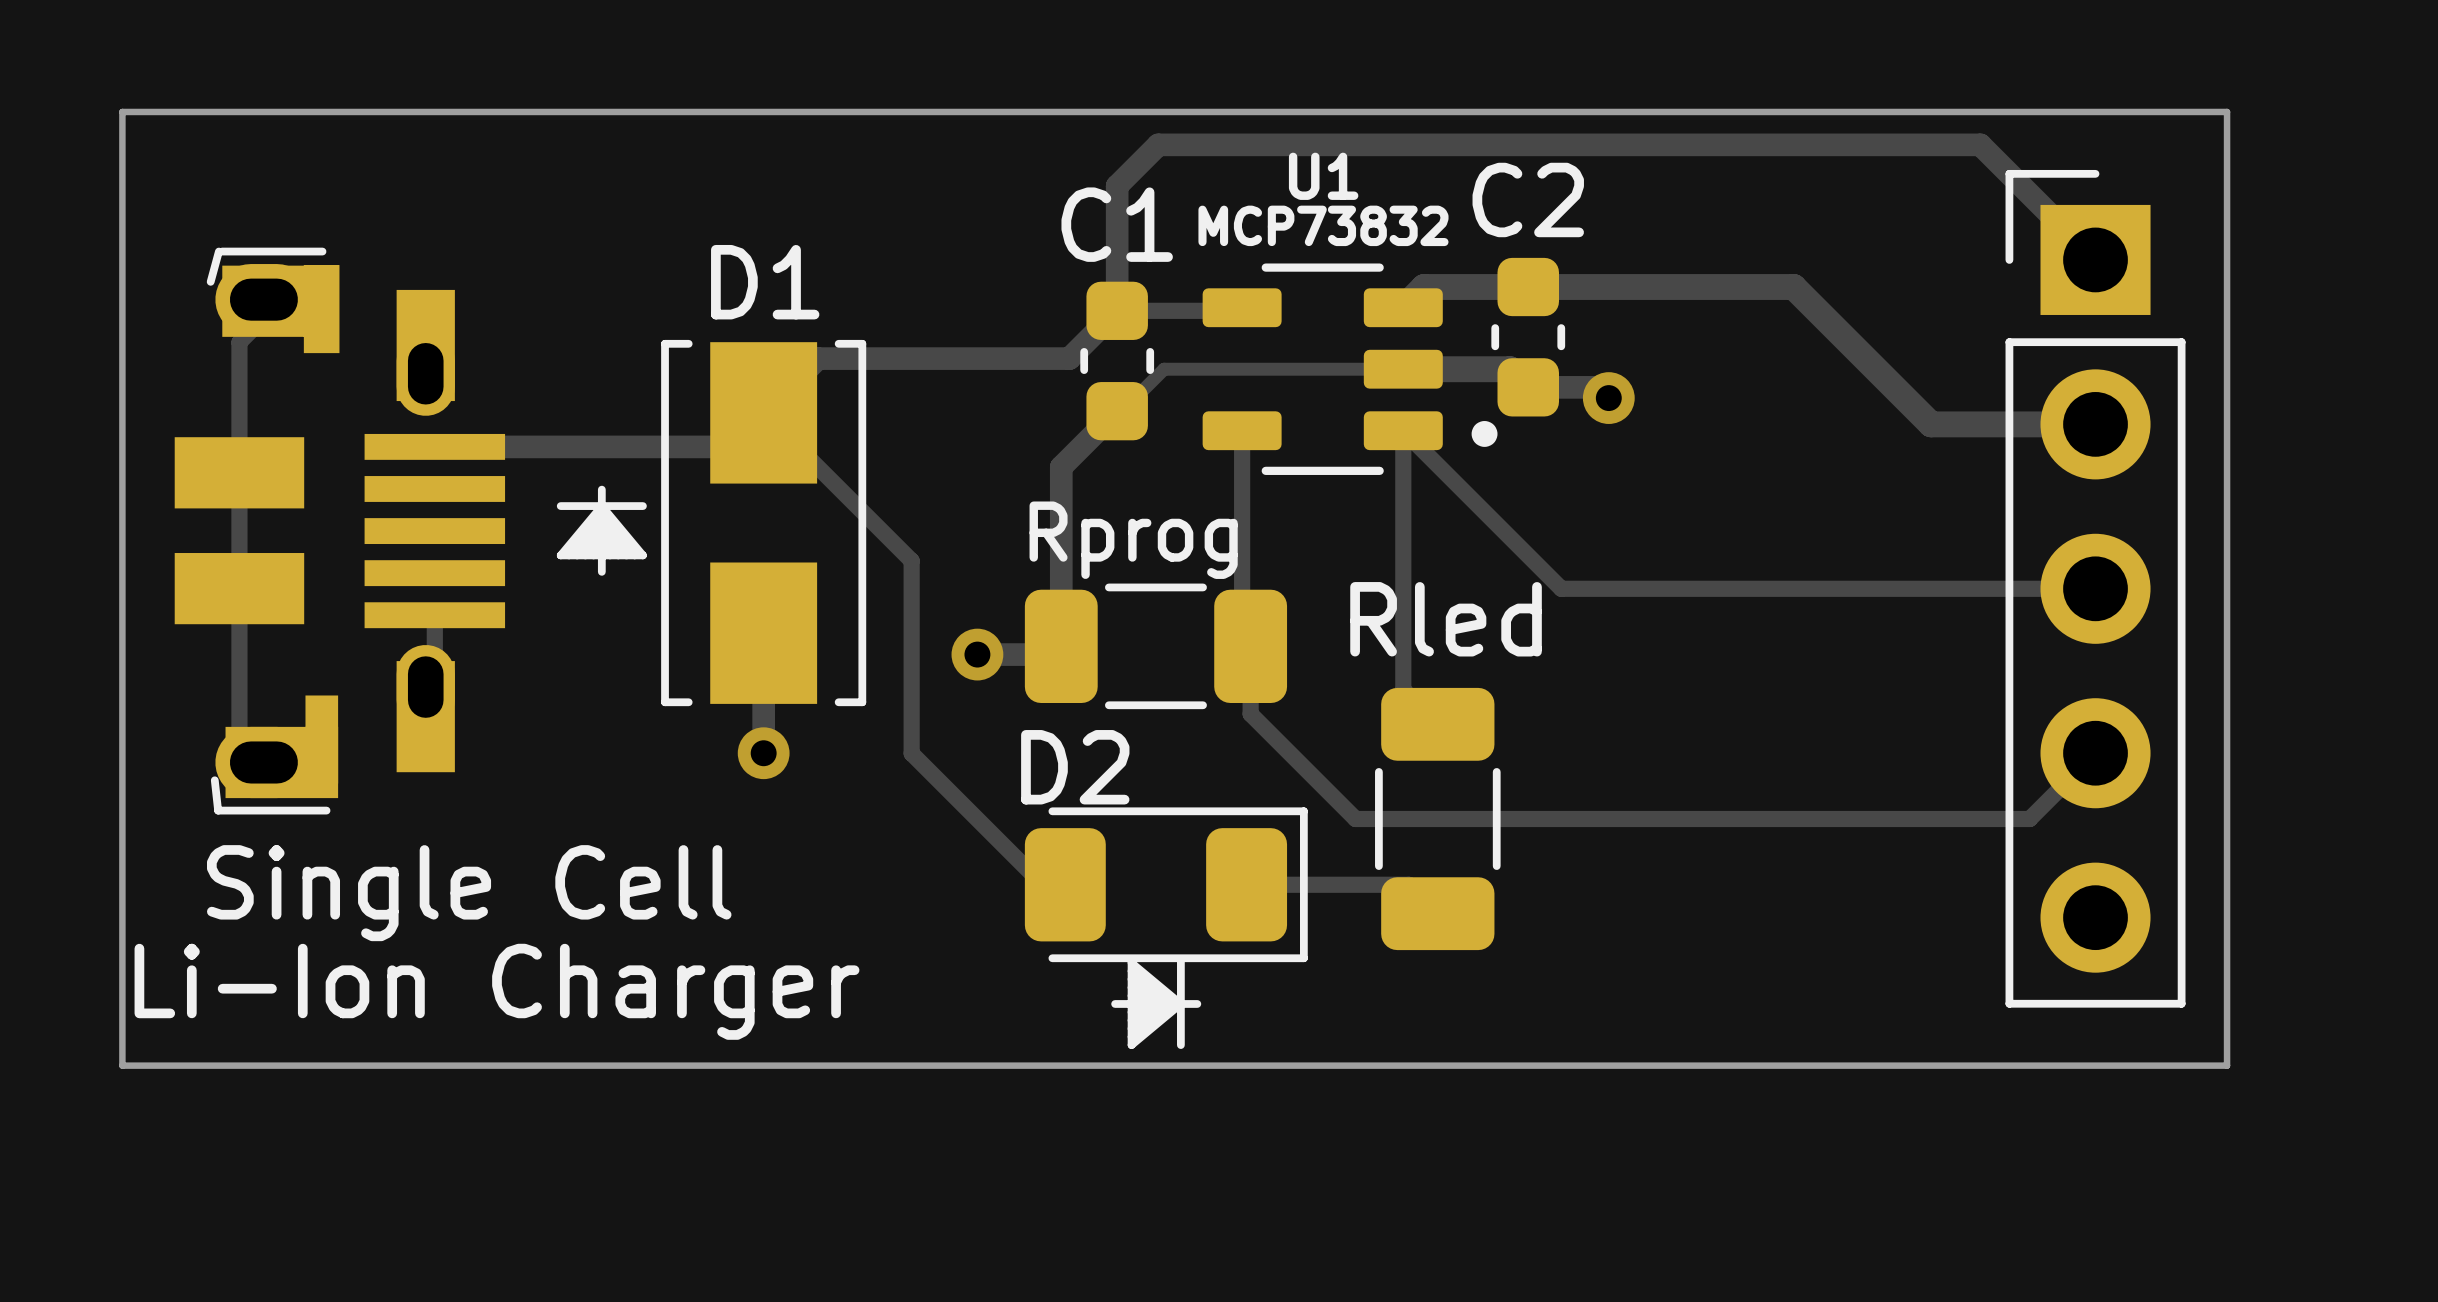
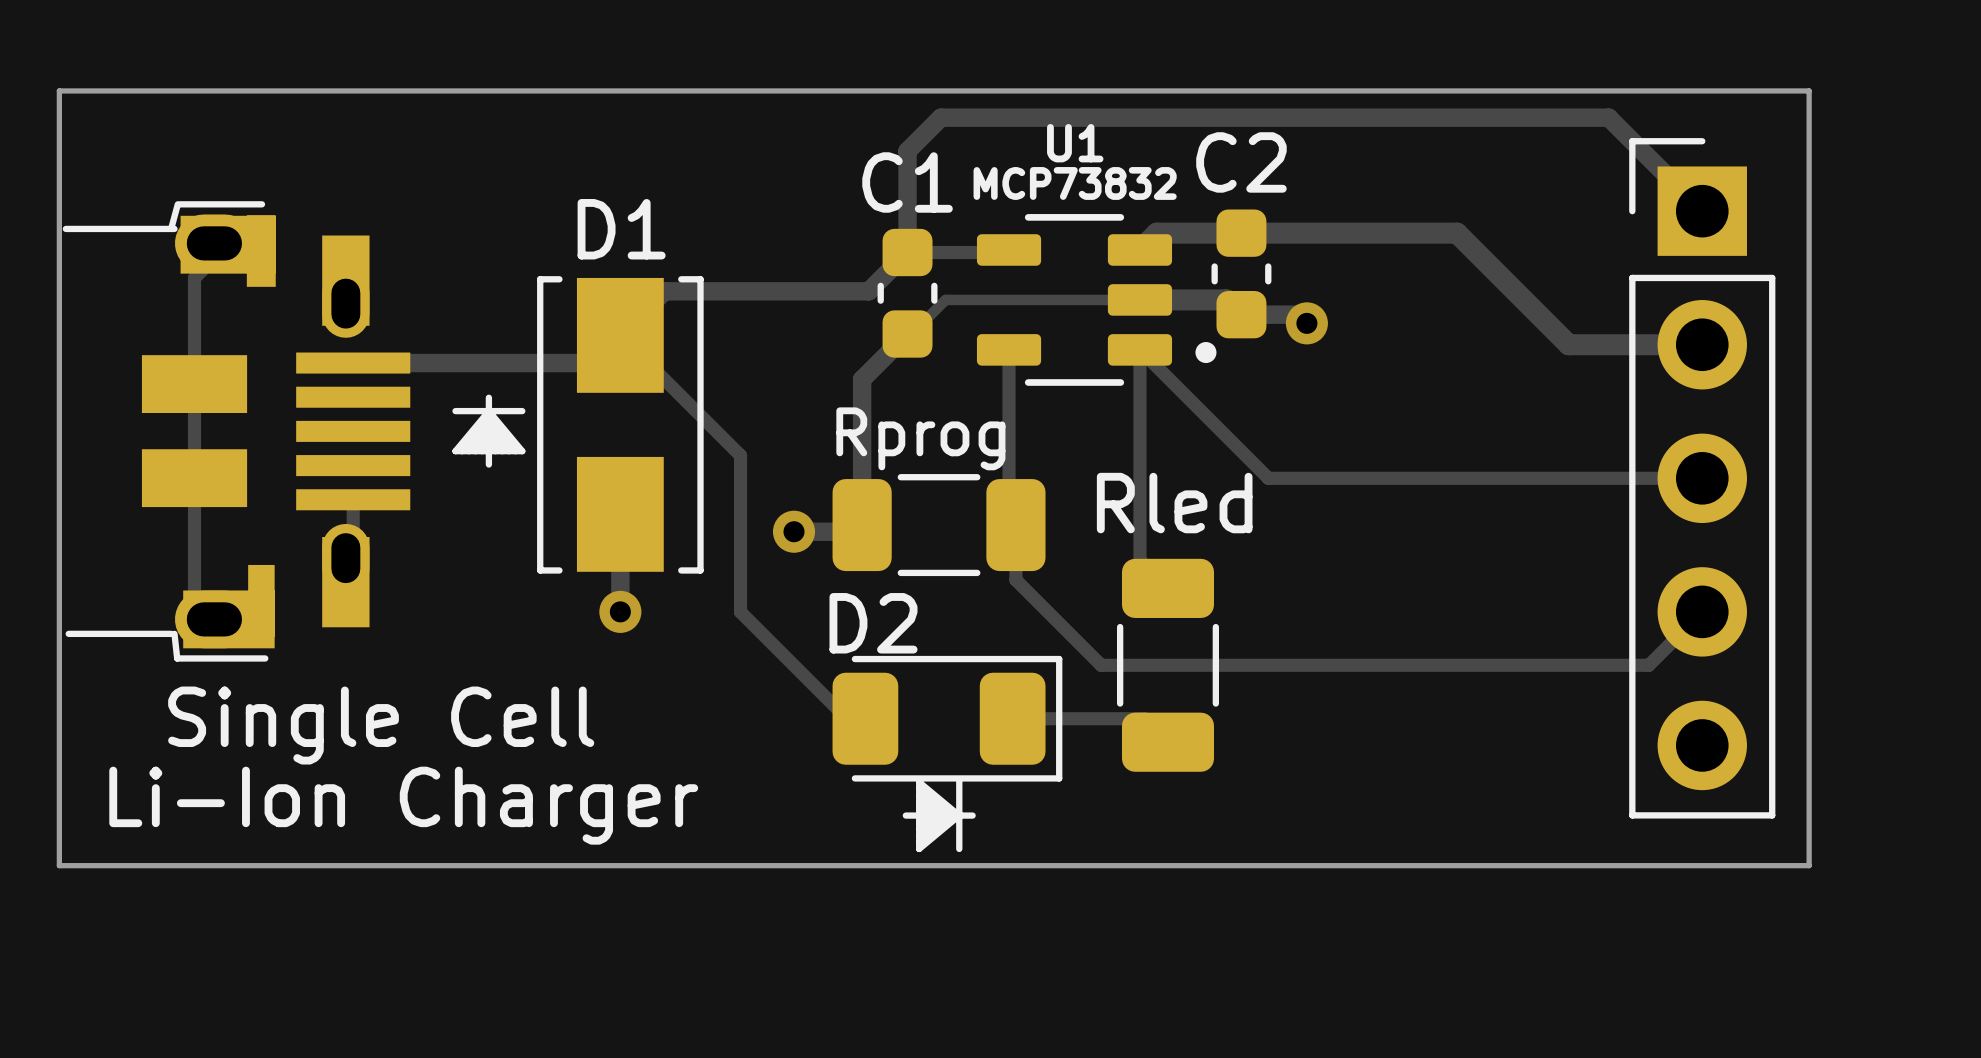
board edge: (122, 111) (122, 1065) -> (99, 90) (59, 90) (59, 865) (99, 865)
part footprint: [174, 247, 506, 815] -> [62, 201, 411, 662]

